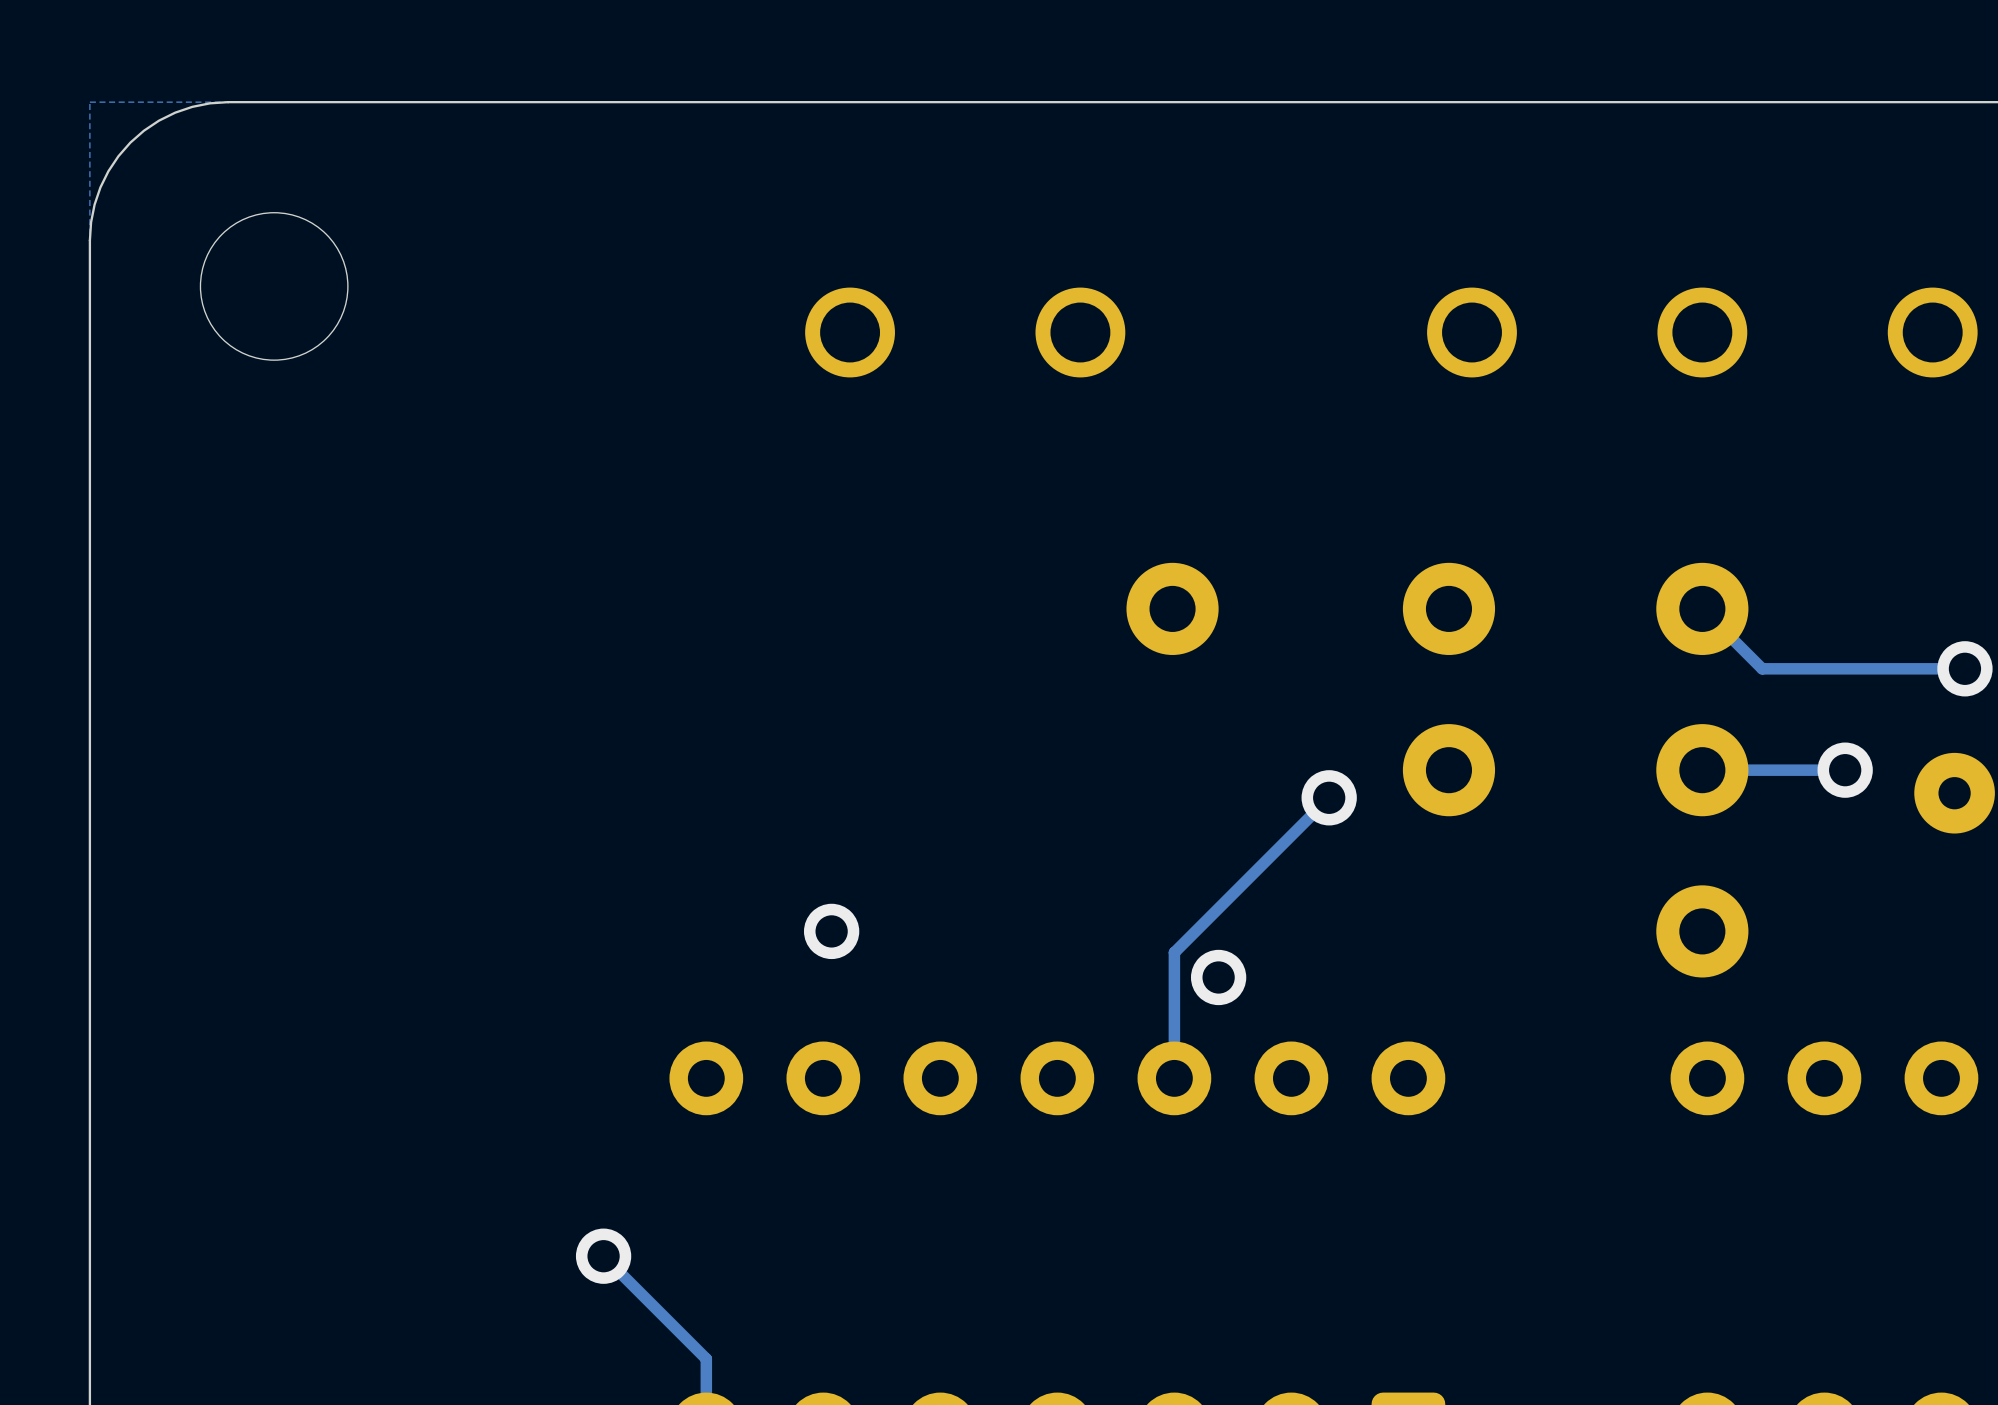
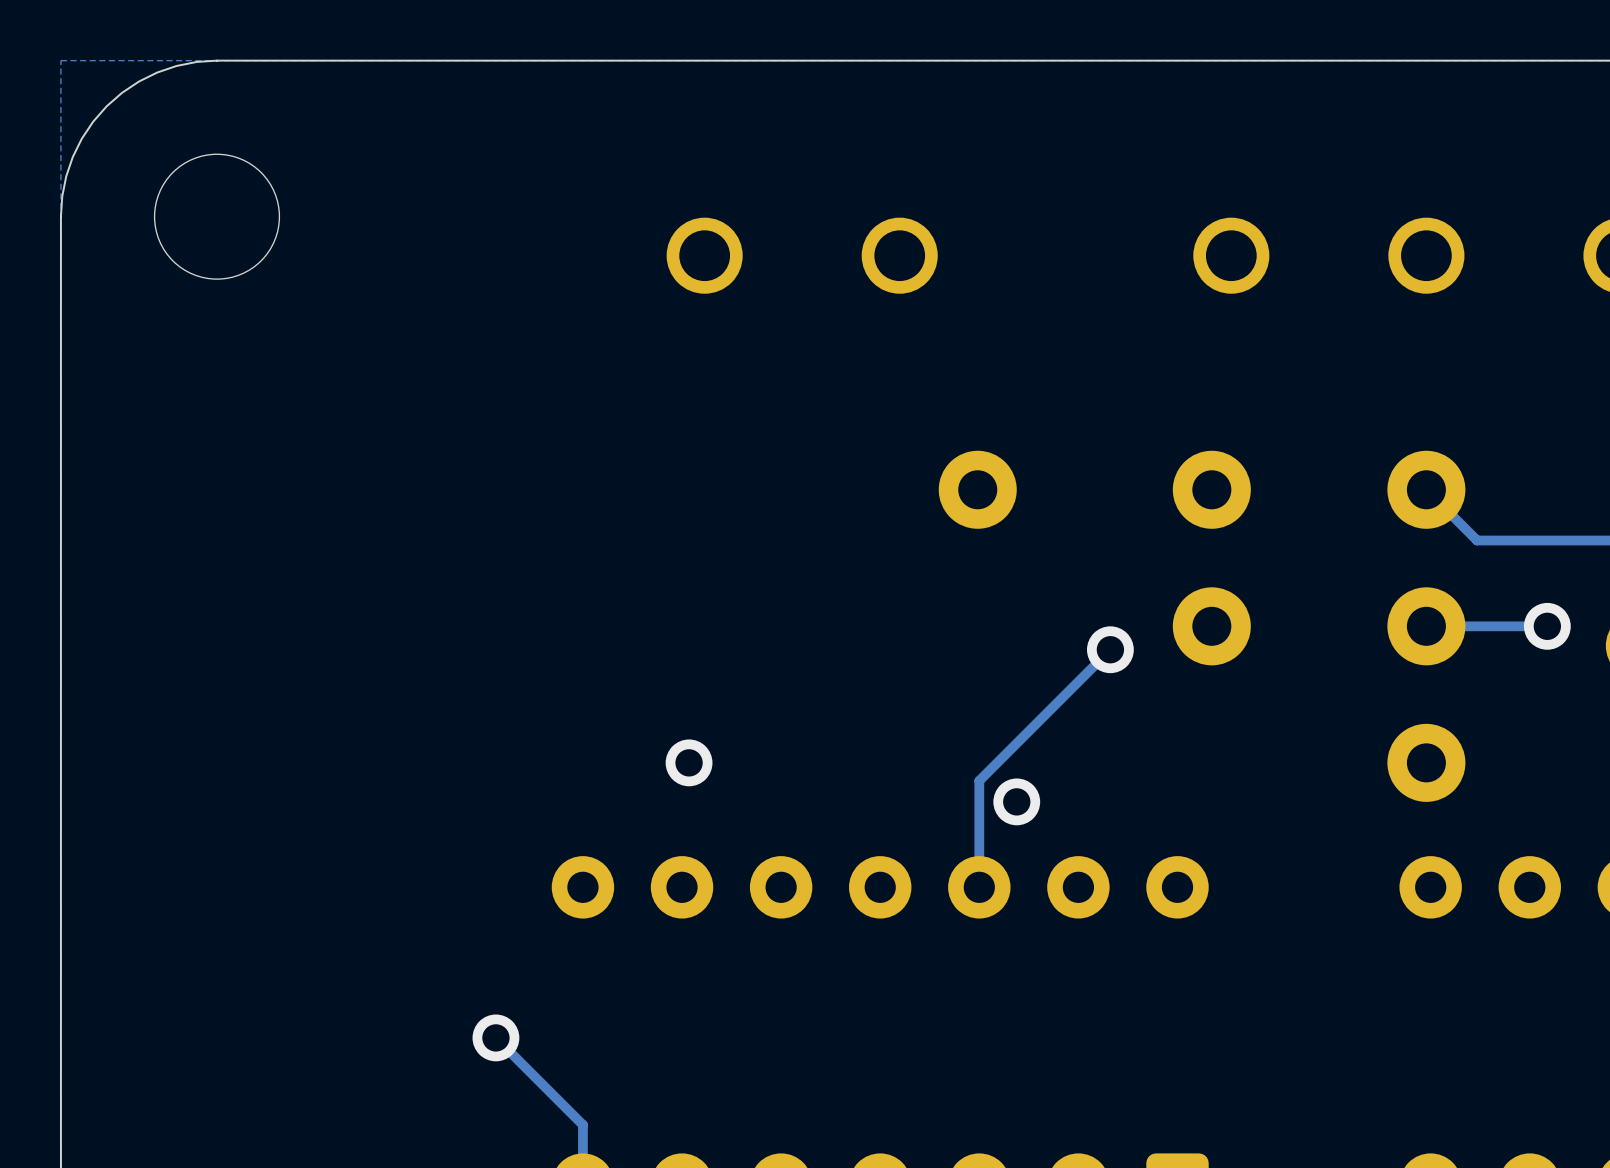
board edge: (274, 102) (228, 102) (192, 106) (159, 120) (130, 142) (108, 171) (94, 204) (89, 240) (89, 286) -> (216, 60) (196, 61) (157, 72) (122, 92) (106, 106) (81, 138) (72, 156) (66, 176) (60, 216)

